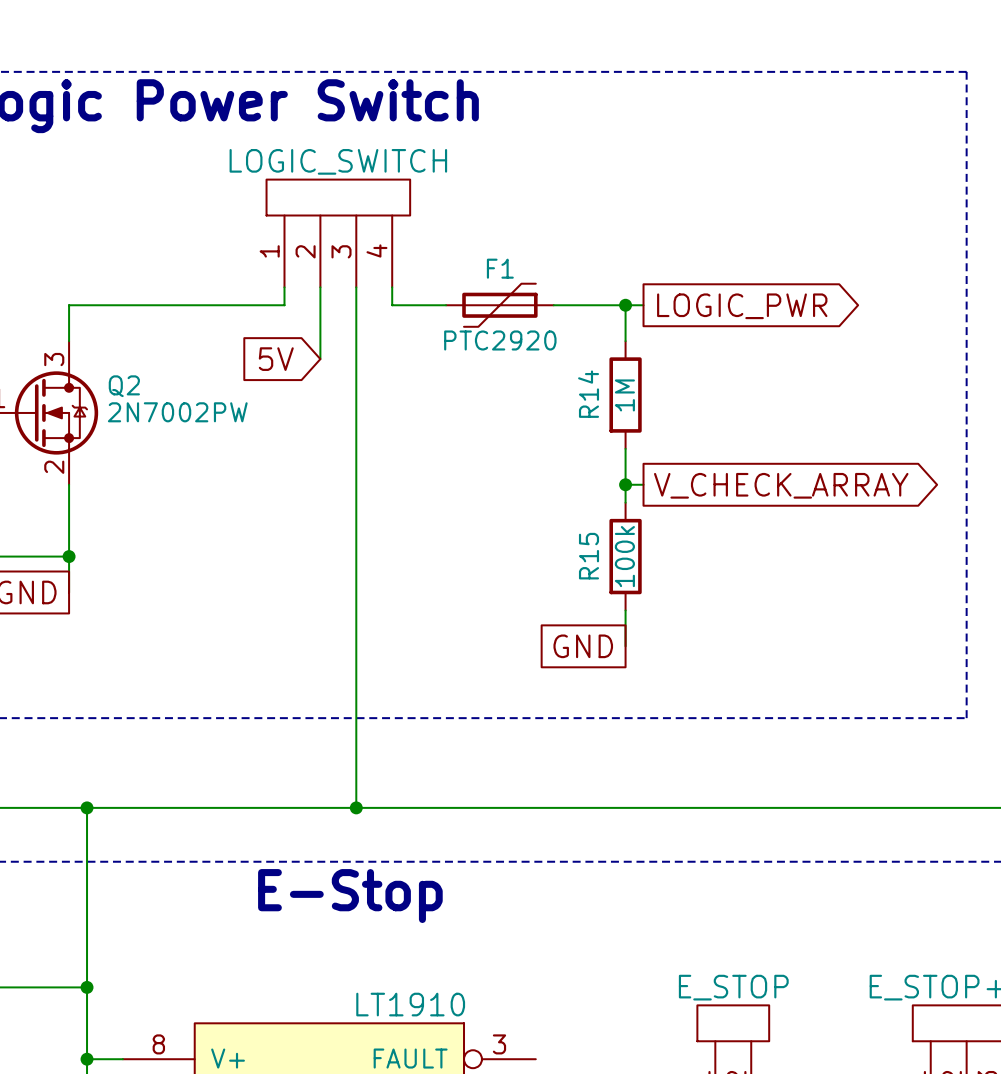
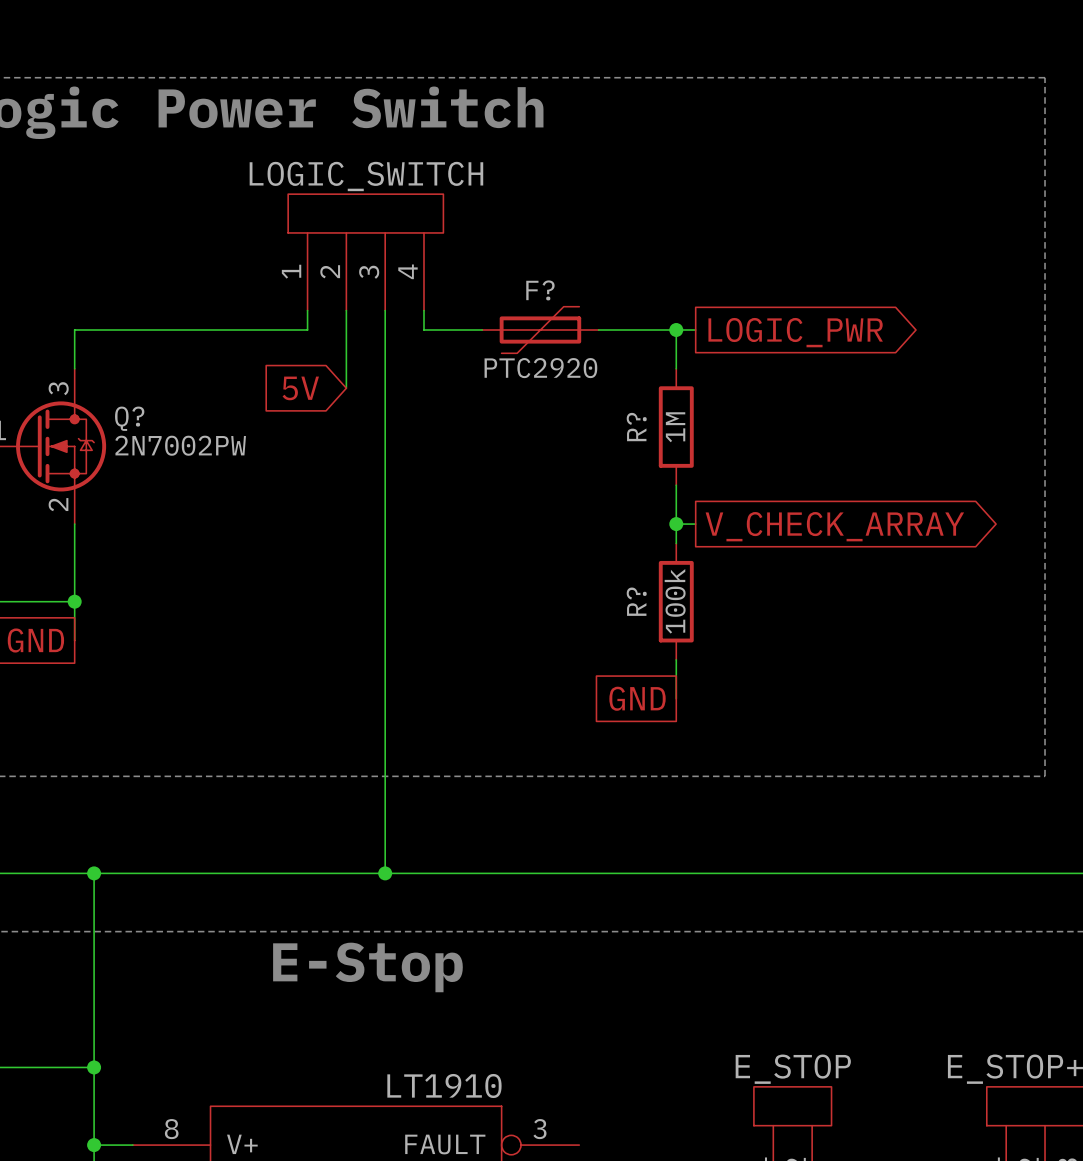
F1 name: F1 (500, 268) -> F? (540, 290)
Q2 name: Q2 (124, 386) -> Q? (129, 418)
R14 name: R14 (588, 394) -> R? (636, 427)
R15 name: R15 (588, 556) -> R? (636, 601)

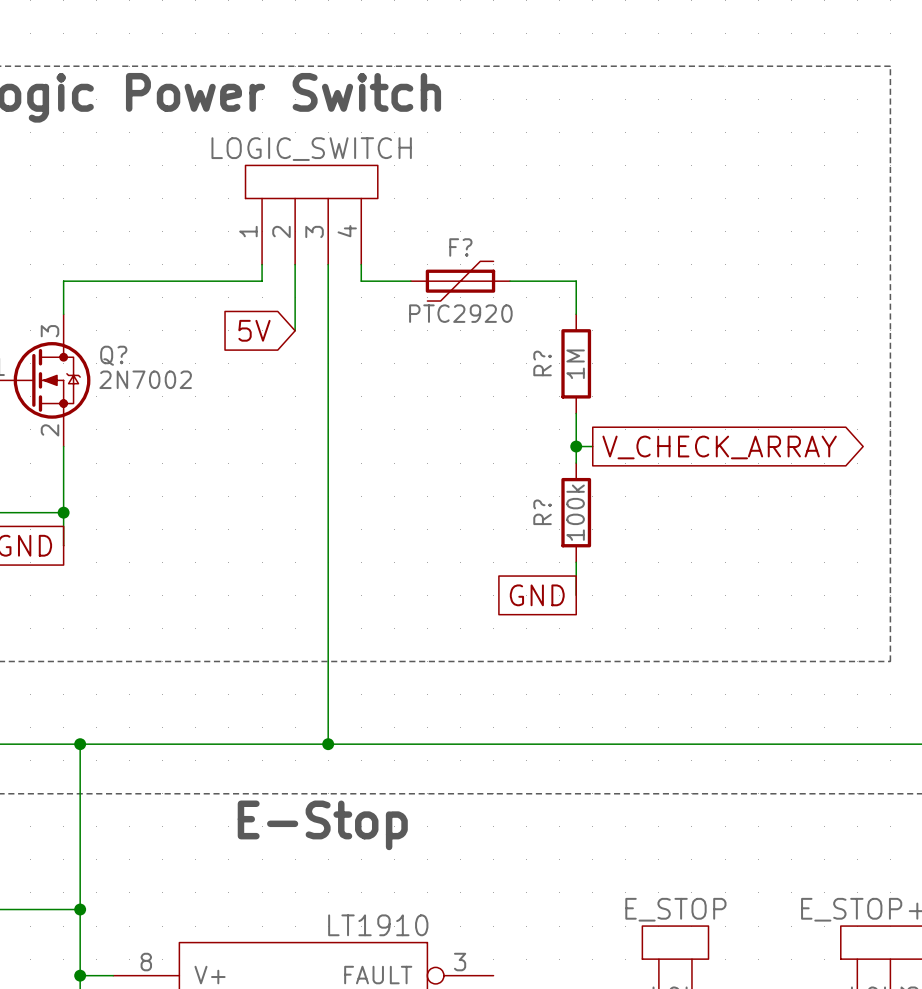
wire: (676, 330) (695, 330) -> none
junction: (676, 330) -> none
global label: LOGIC_PWR (795, 332) -> none
Q? value: 2N7002PW (180, 445) -> 2N7002 (145, 379)

